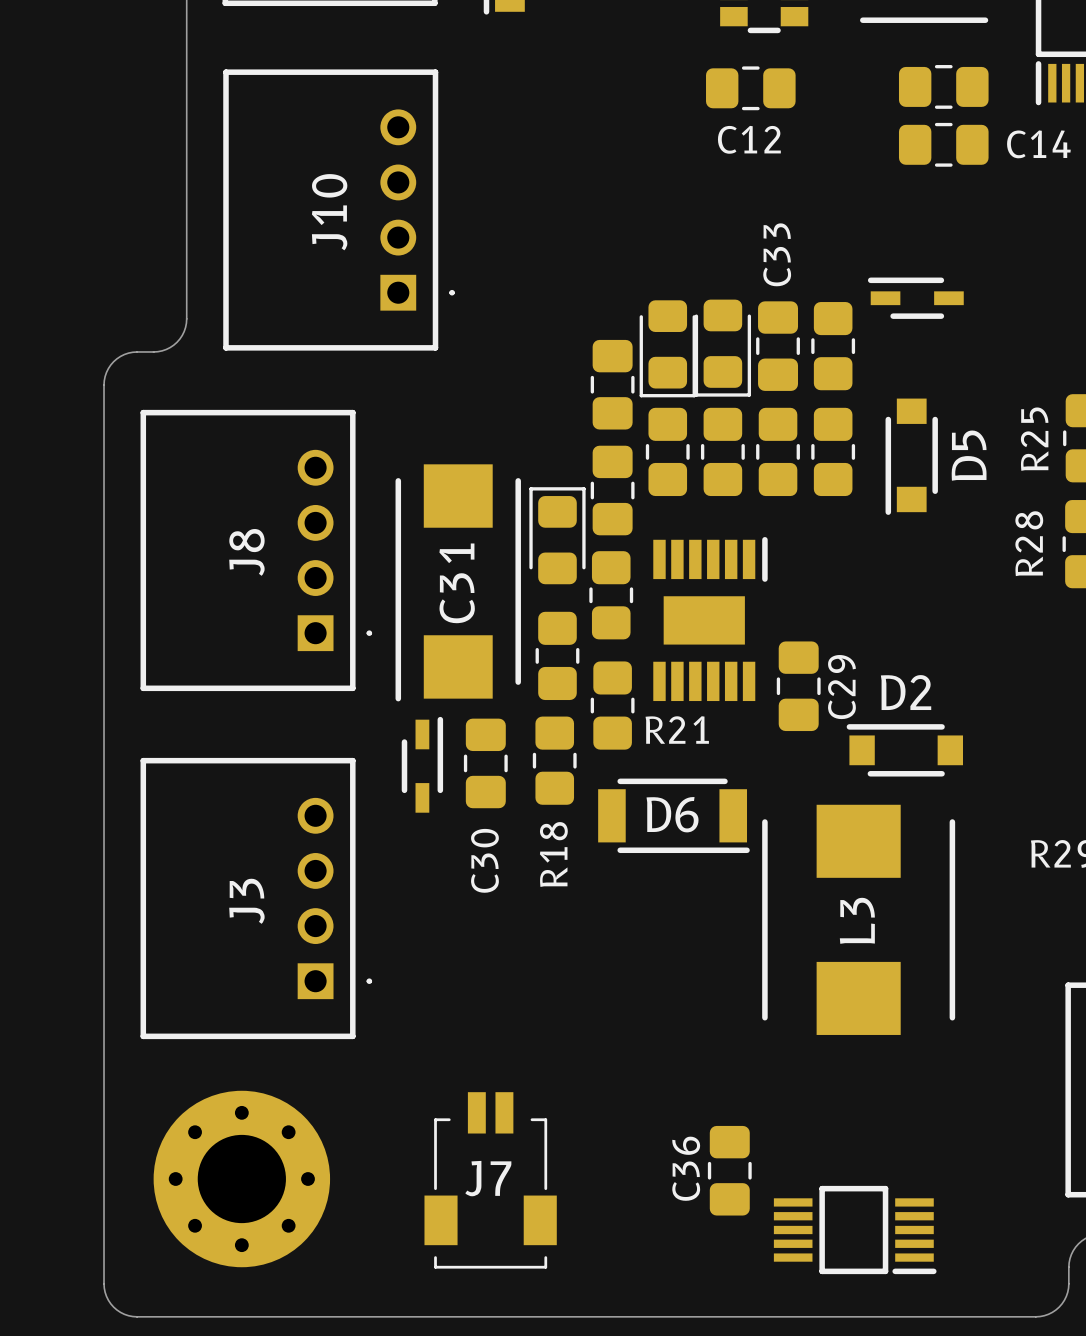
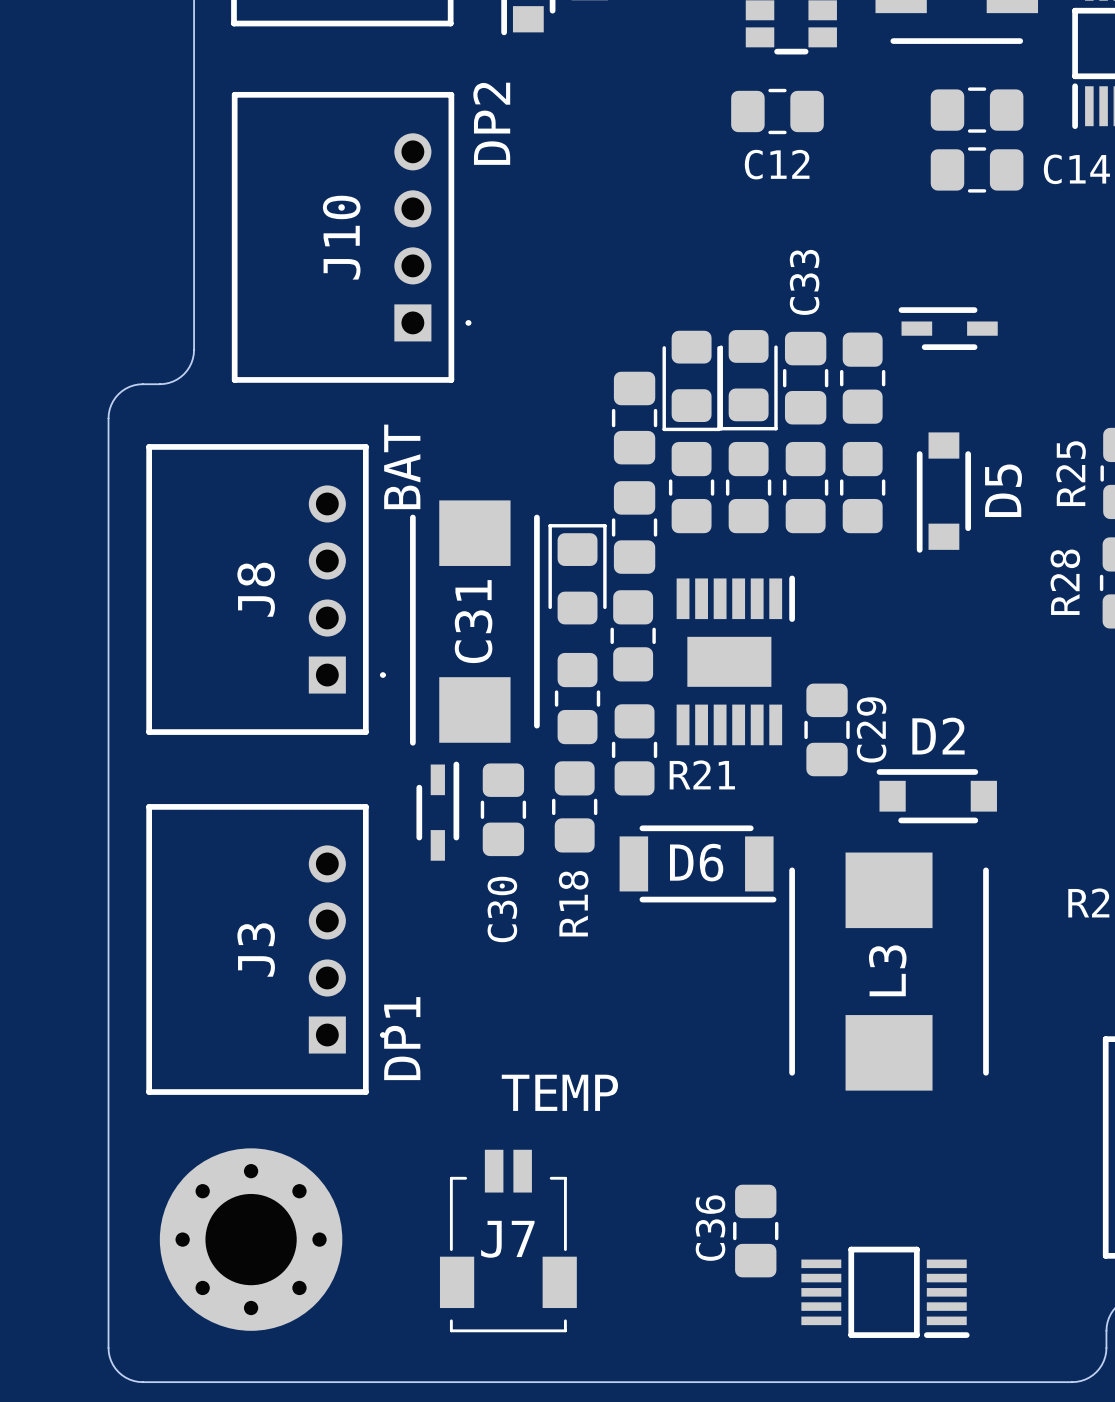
text: none -> DP2 (491, 123)
text: none -> BAT (402, 466)
text: none -> DP1 (402, 1038)
text: none -> TEMP (559, 1092)

